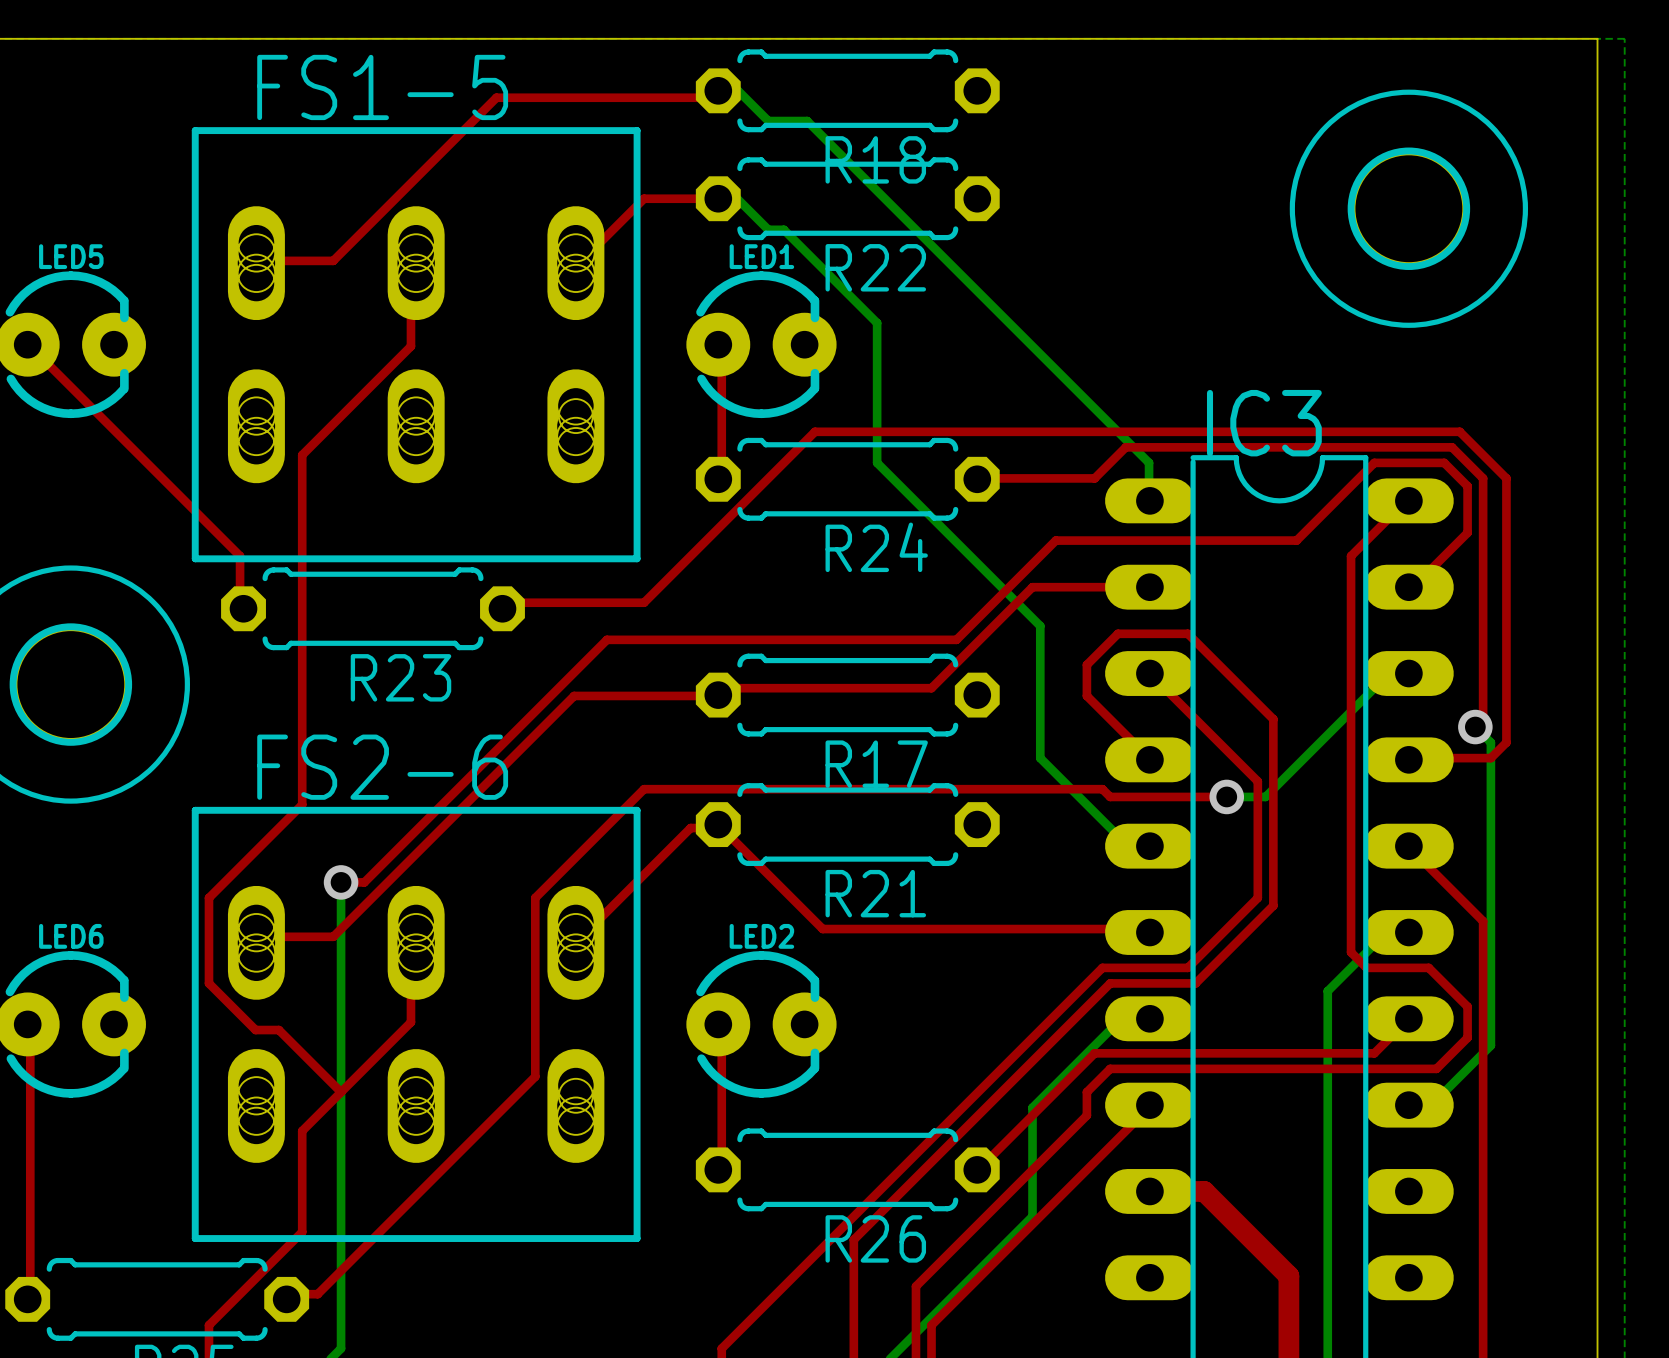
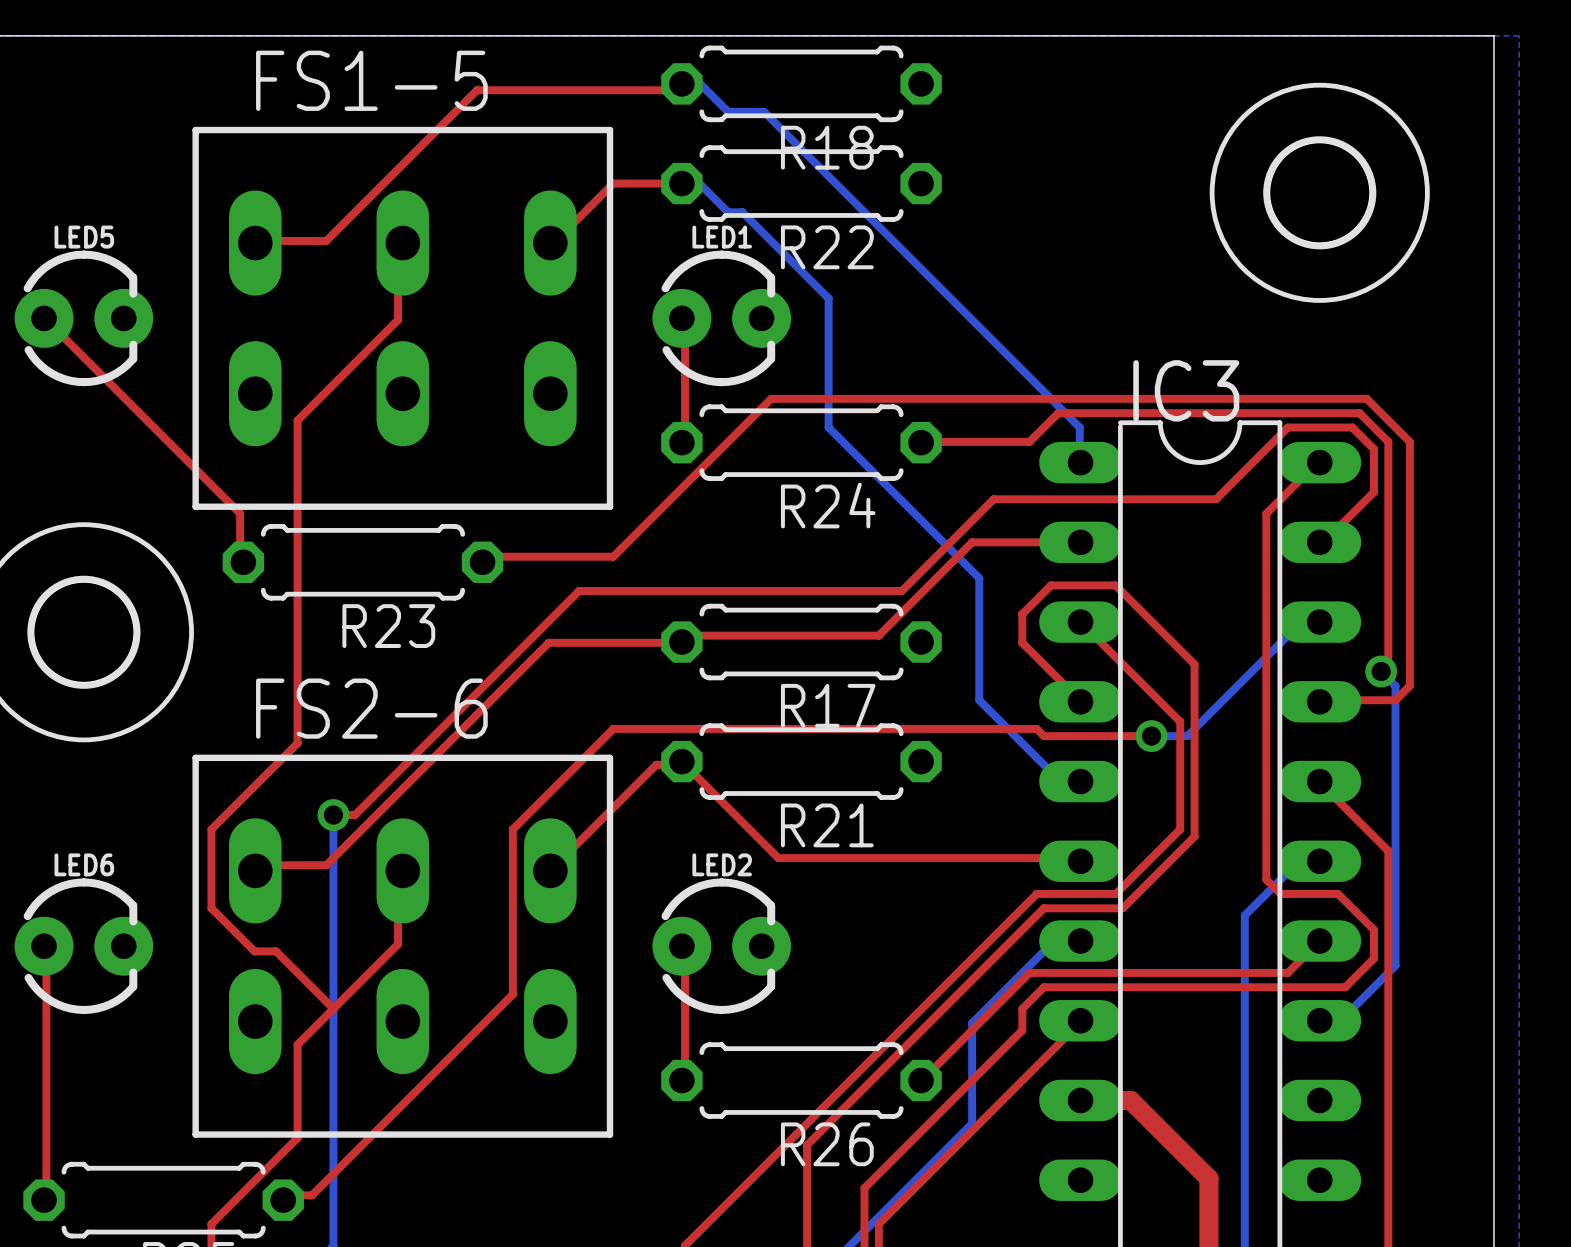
FS1-5 footprint: [191, 127, 641, 563] -> [192, 126, 614, 510]
FS2-6 footprint: [191, 806, 641, 1242] -> [192, 754, 614, 1138]

